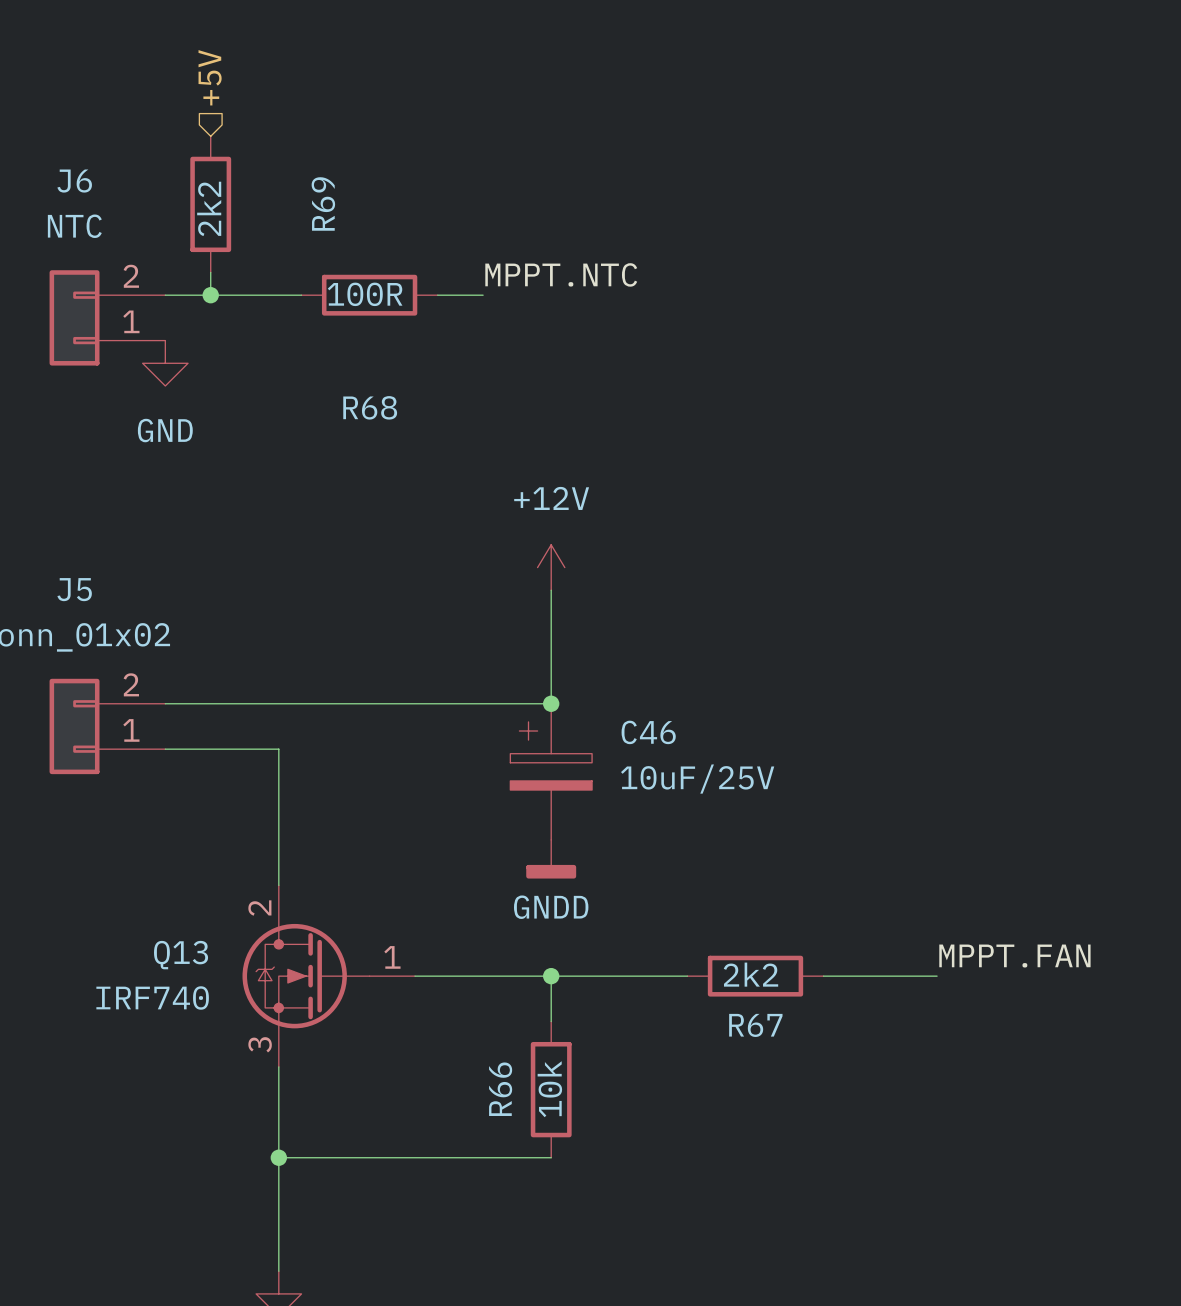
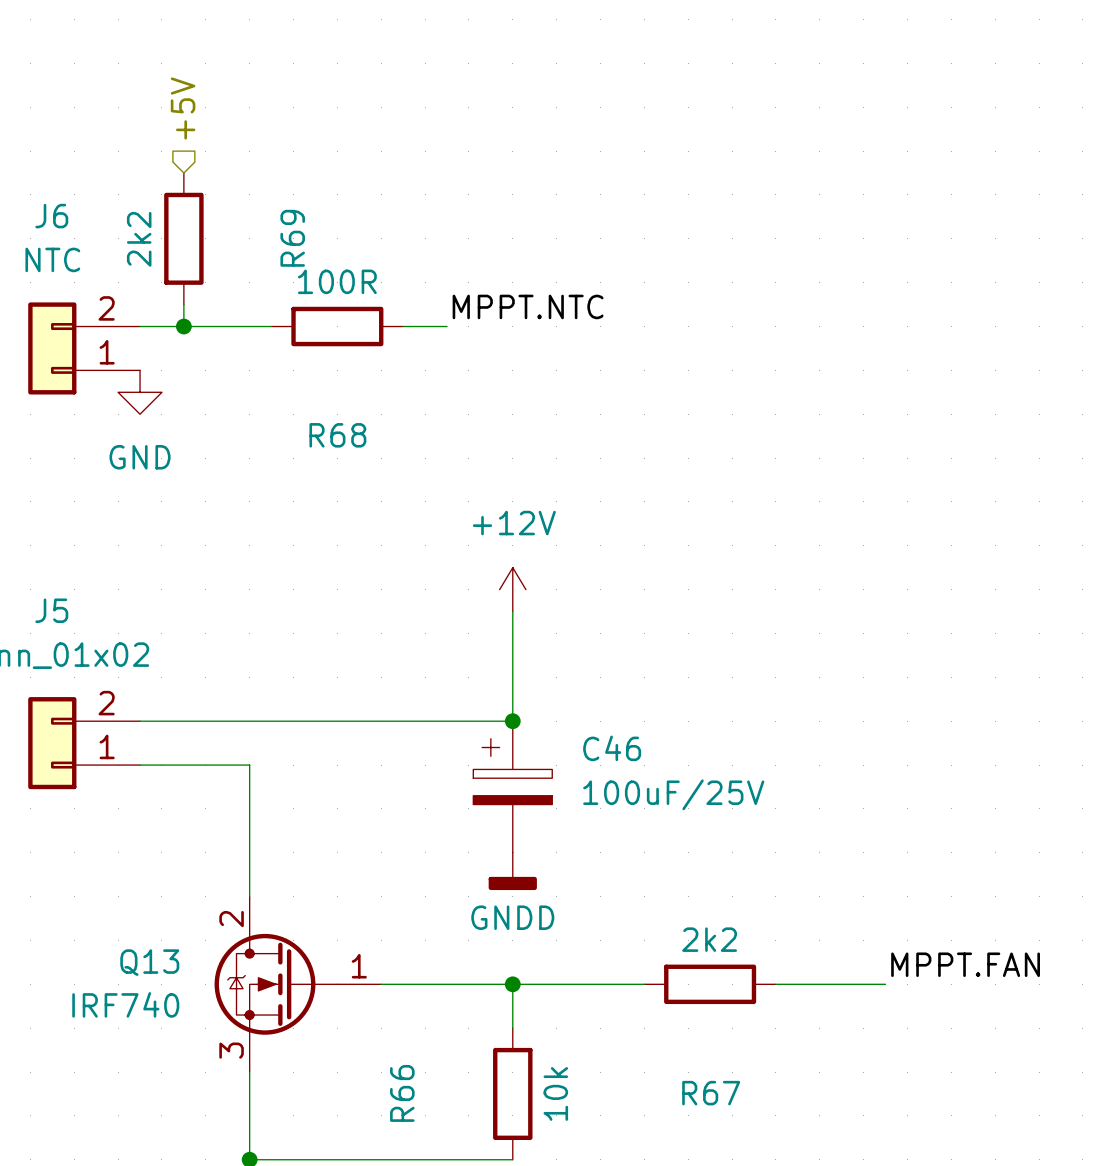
R69 value position: 2k2 (209, 208) -> 2k2 (139, 239)
R68 value position: 100R (365, 294) -> 100R (337, 281)
C46 value: 10uF/25V (697, 779) -> 100uF/25V (673, 794)
R67 value position: 2k2 (750, 974) -> 2k2 (709, 939)
R67 name position: R67 (755, 1025) -> R67 (711, 1093)
R66 name position: R66 (500, 1089) -> R66 (402, 1093)
R66 value position: 10k (549, 1089) -> 10k (555, 1093)

